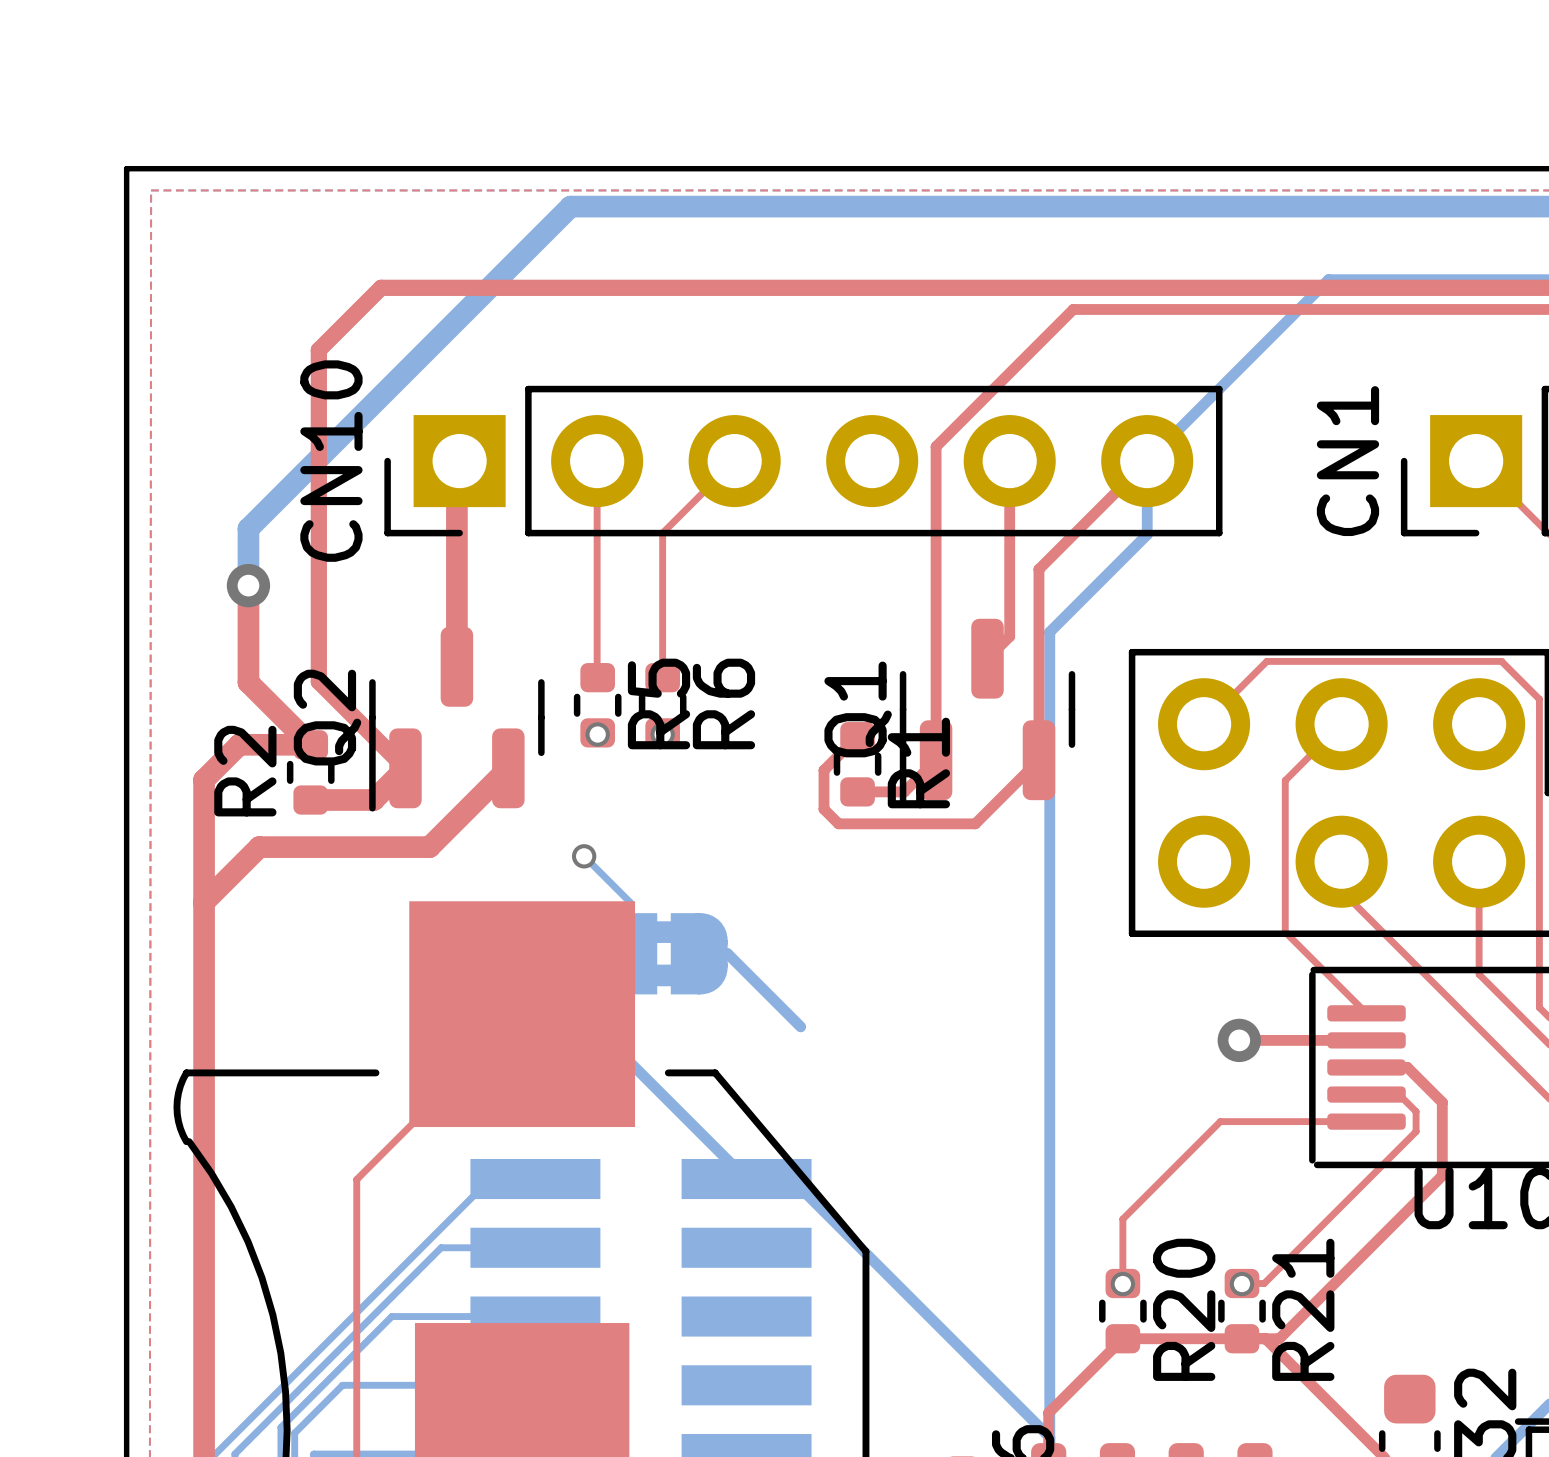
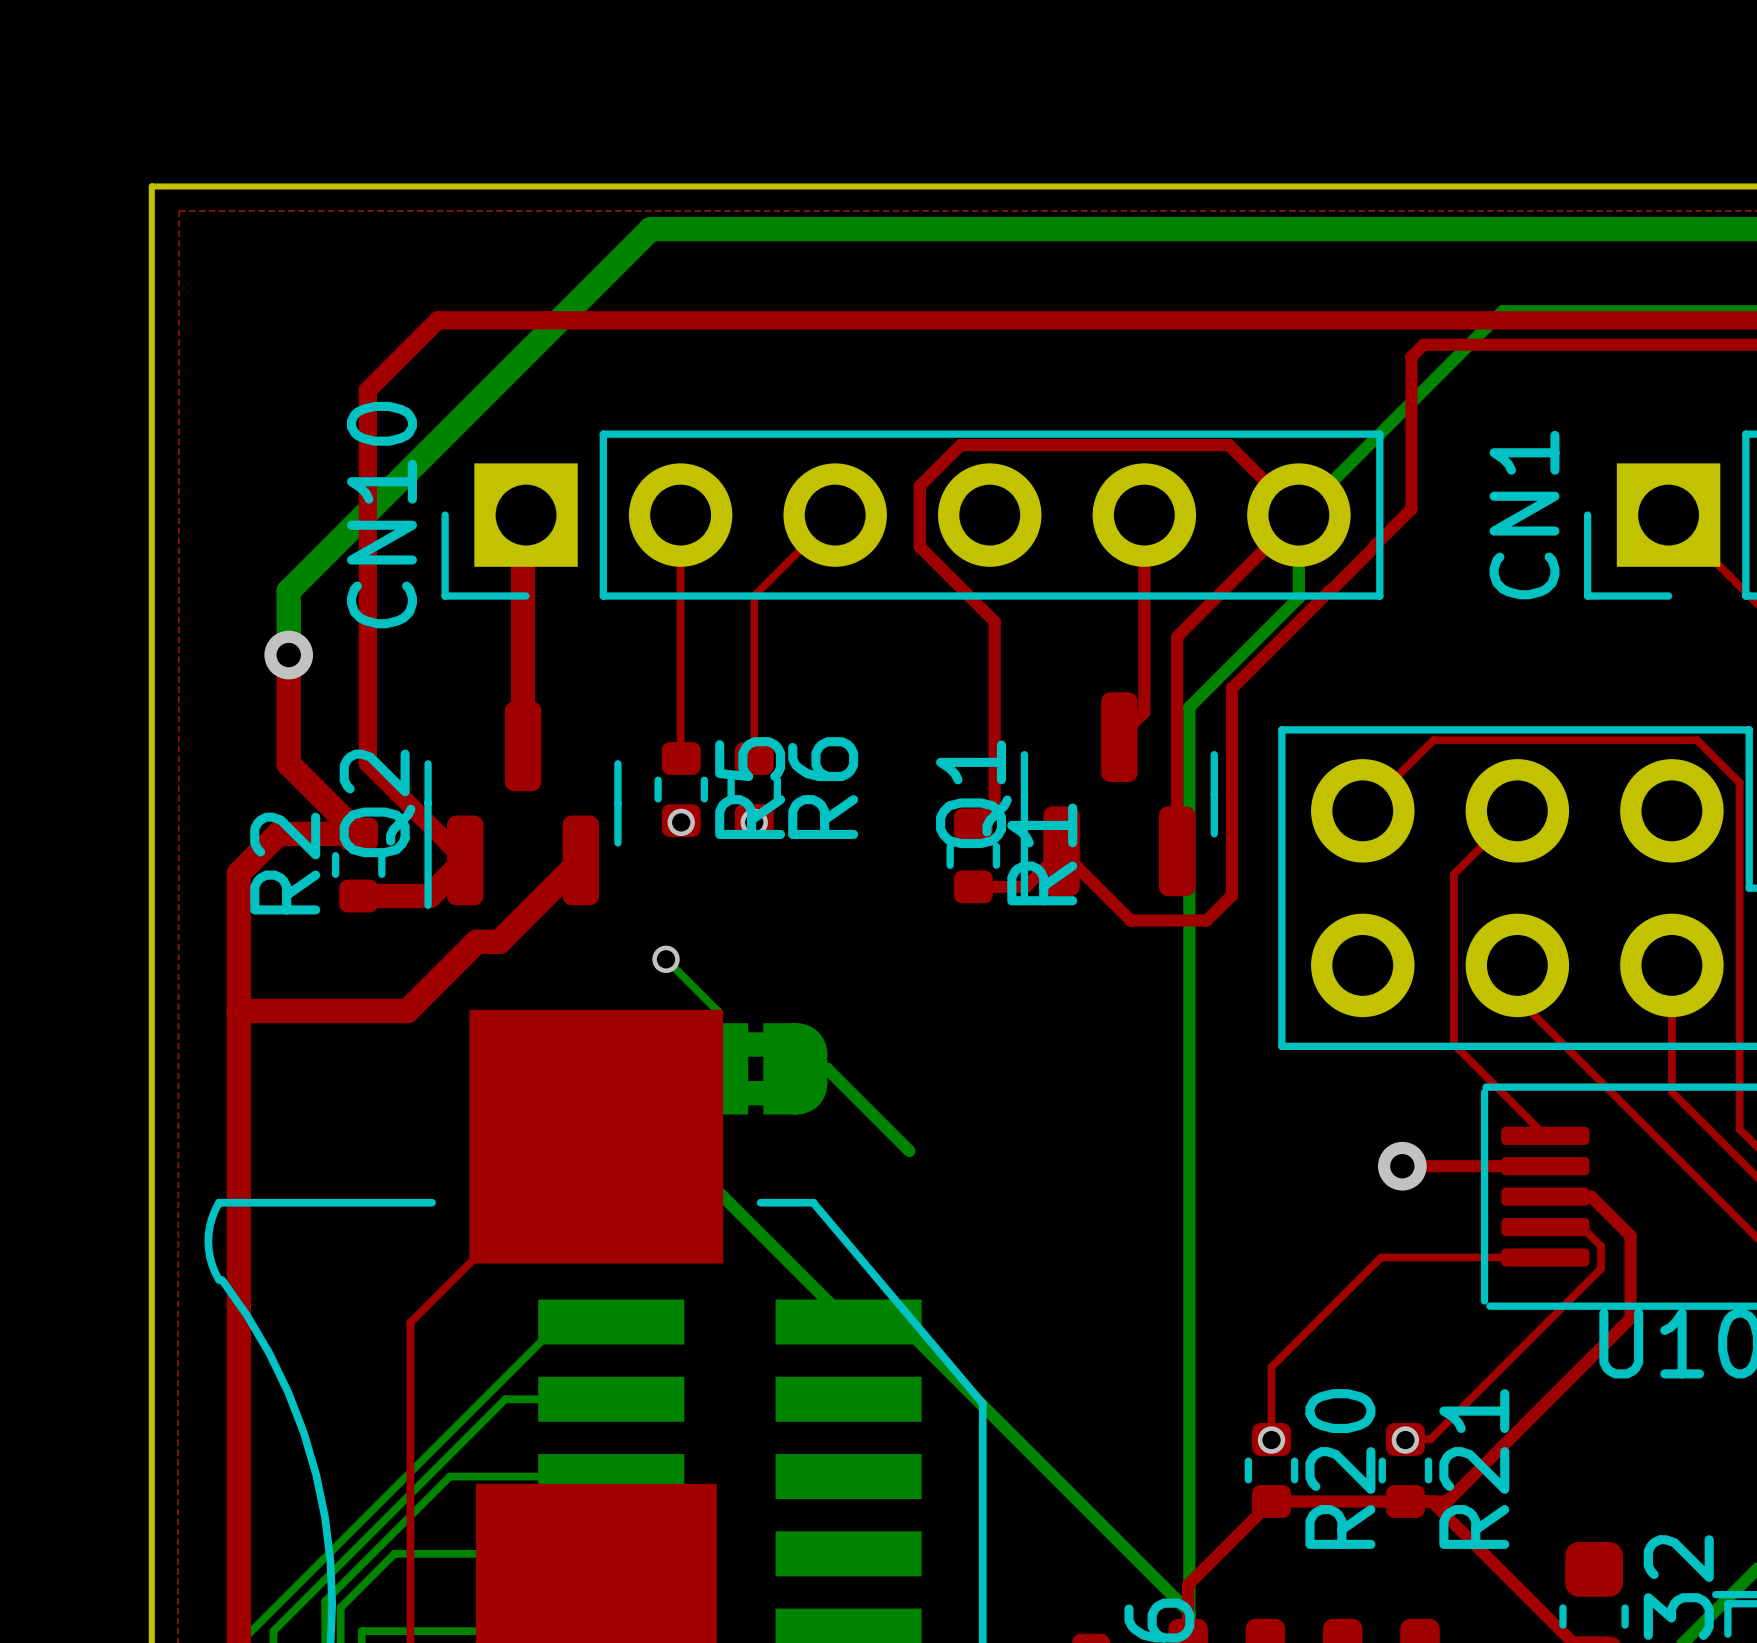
top track: (1258, 309) (1073, 309) (936, 446) (936, 760) -> (1329, 591) (1231, 688) (1231, 895) (1206, 920) (1130, 920) (1061, 851)
top track: none -> (1423, 344) (1411, 356) (1411, 509) (1374, 545)
top track: none -> (1374, 546) (1330, 591)
top track: (857, 736) (824, 770) (824, 809) (838, 823) (975, 823) (1038, 760) -> (973, 824) (994, 803) (994, 621) (919, 546) (919, 486) (960, 445) (1228, 445) (1298, 515)
top track: (435, 840) (429, 847) (259, 847) (204, 902) -> (499, 941) (476, 941) (407, 1011) (238, 1011)

